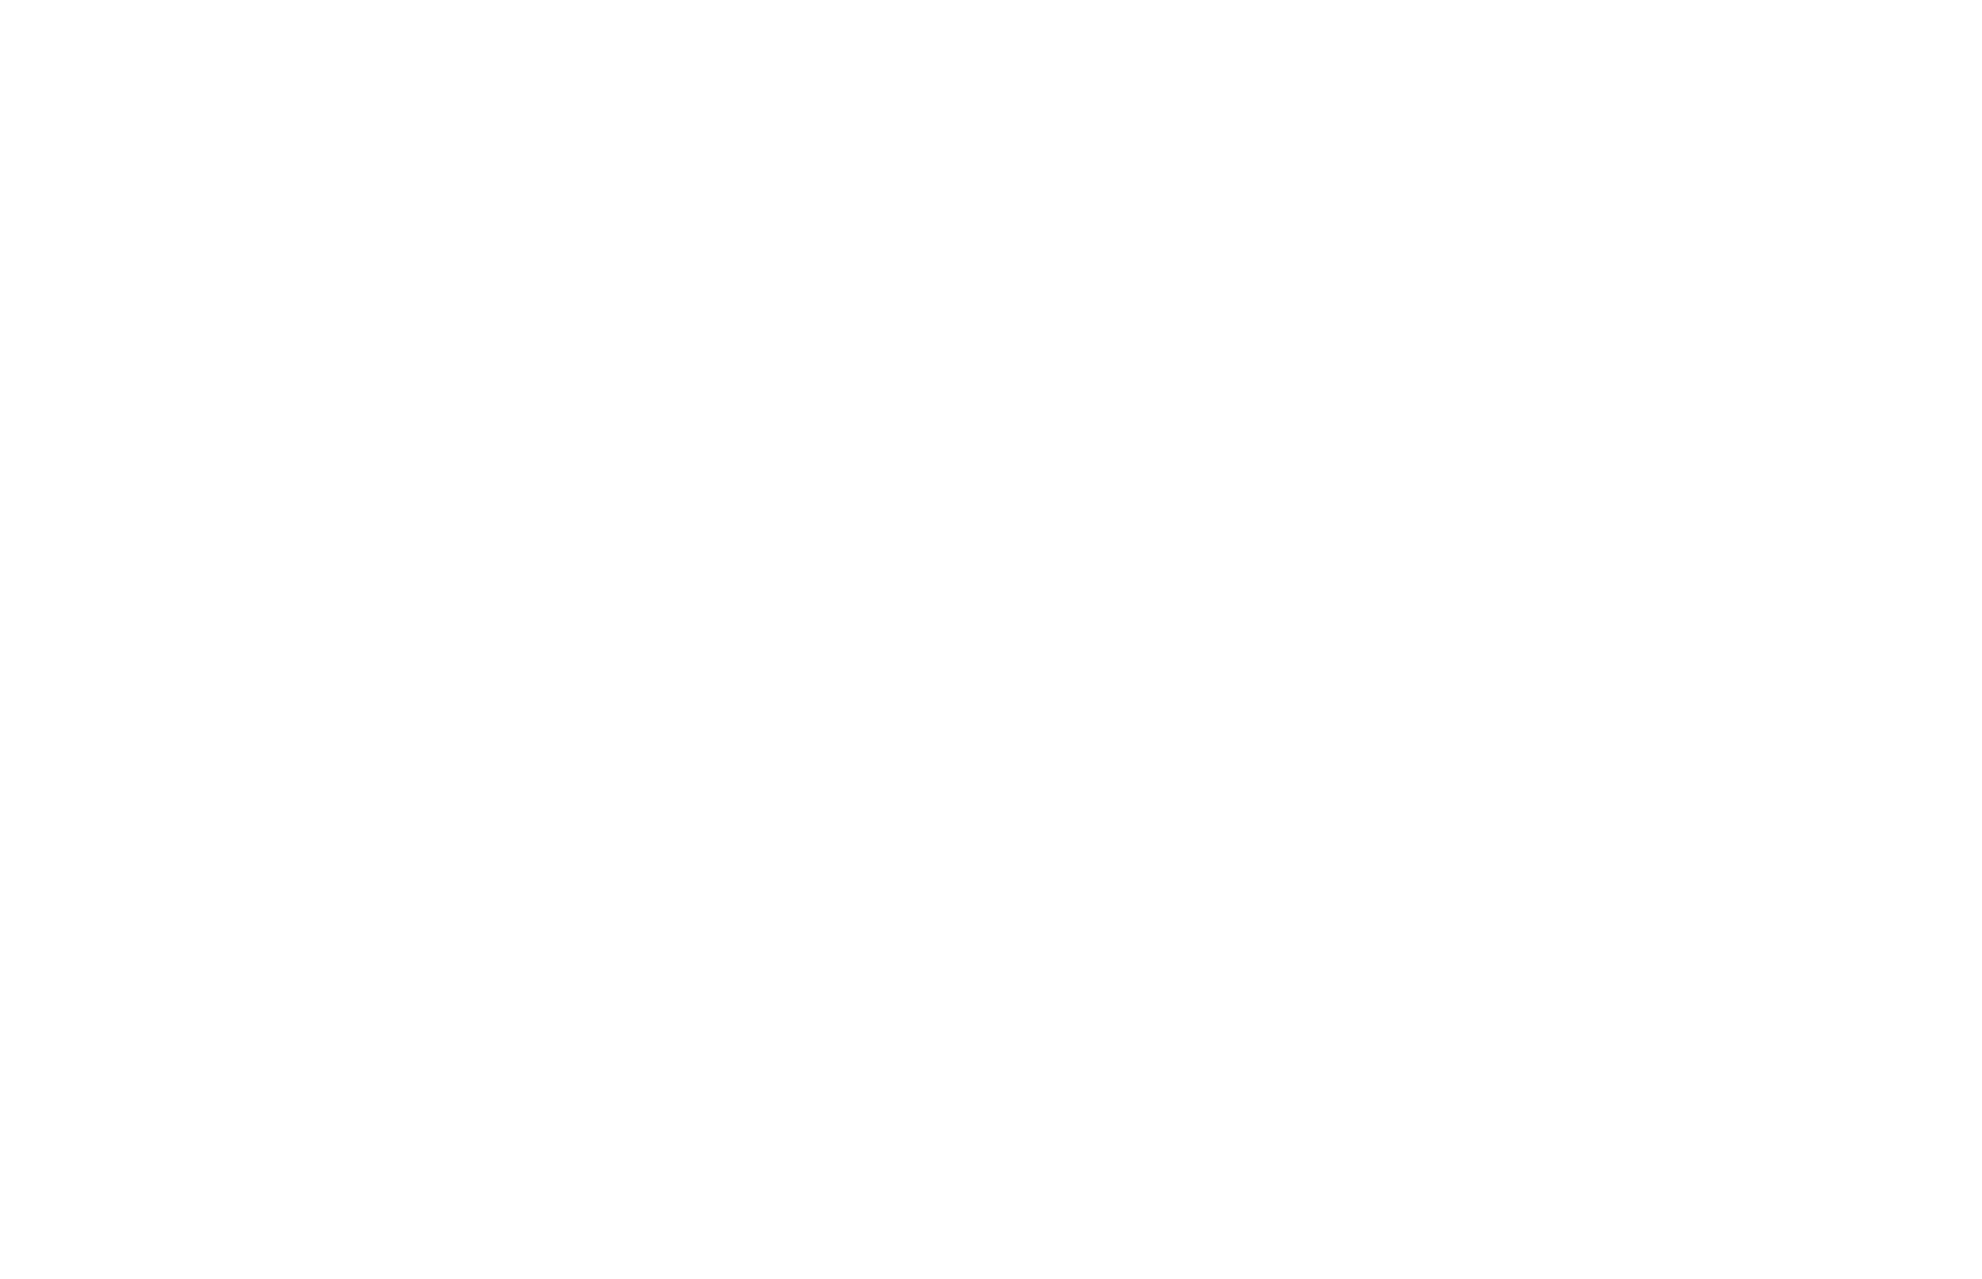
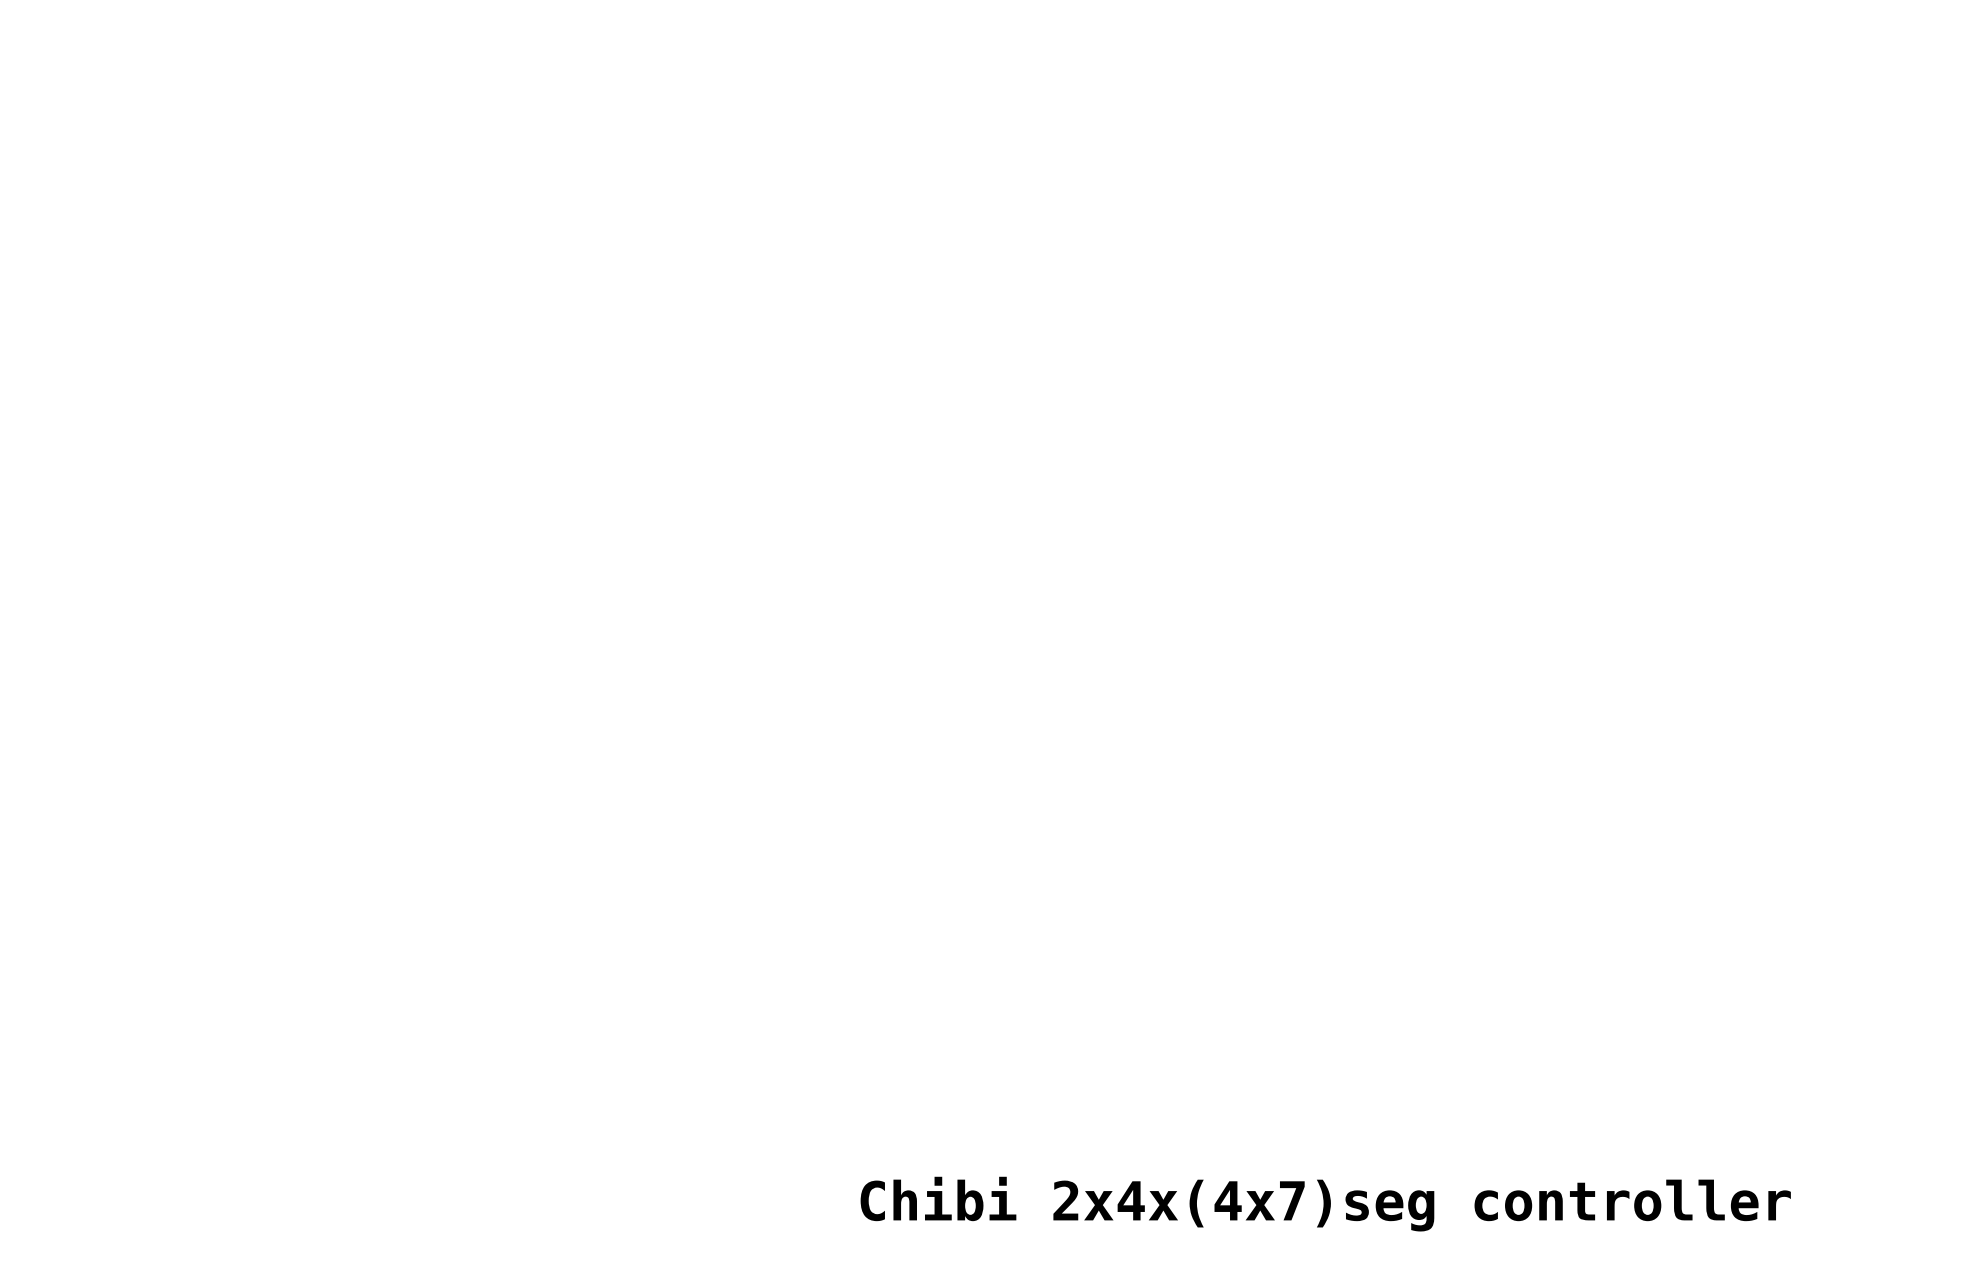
text: none -> Chibi 2x4x(4x7)seg controller (1325, 1204)

